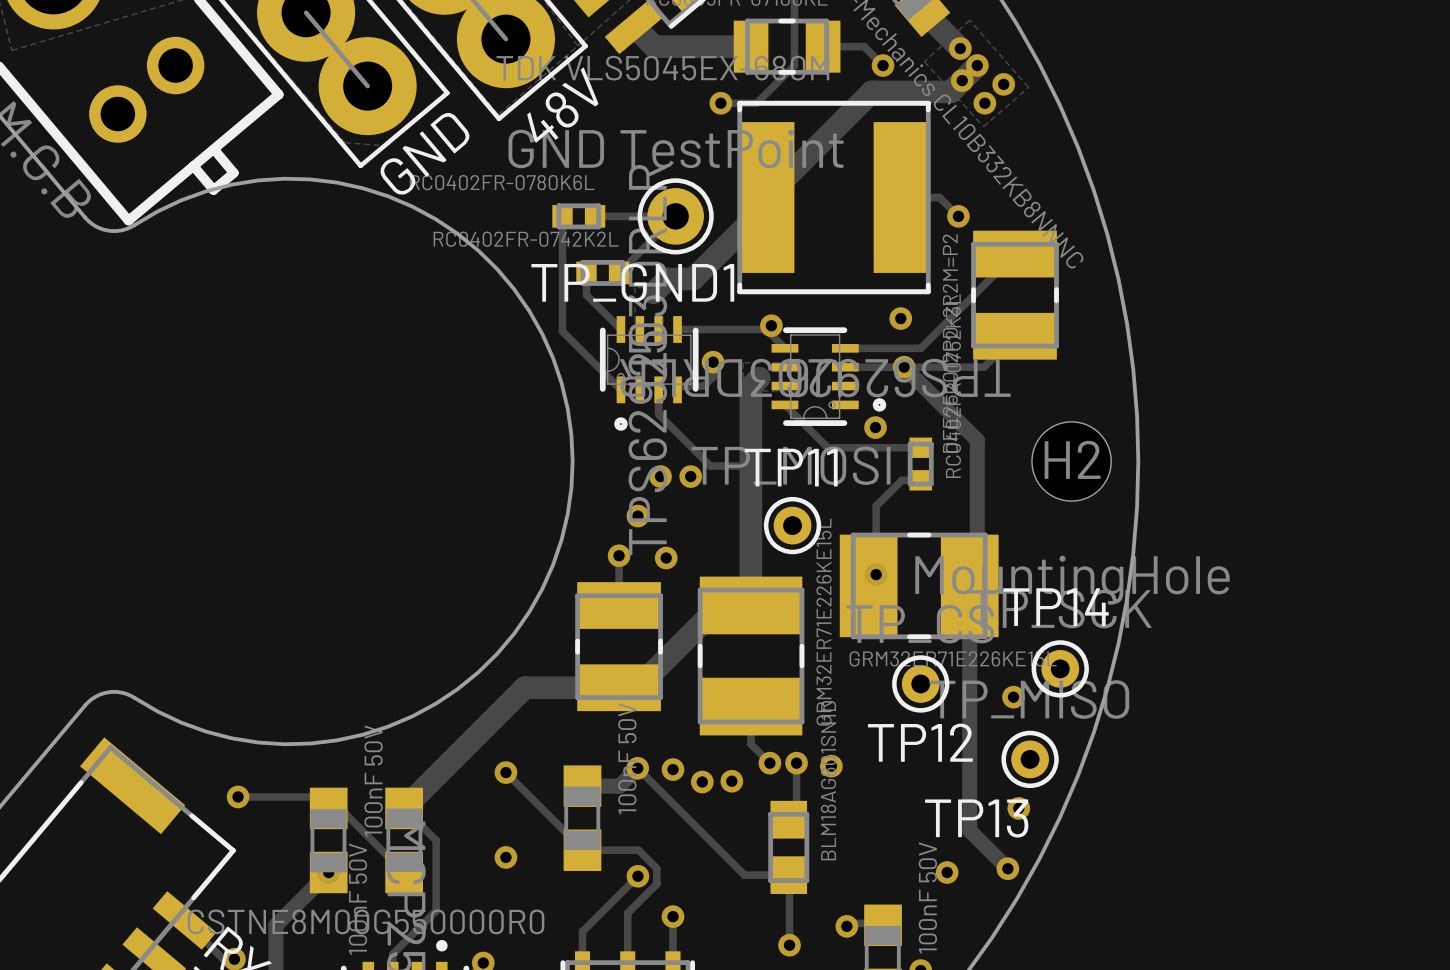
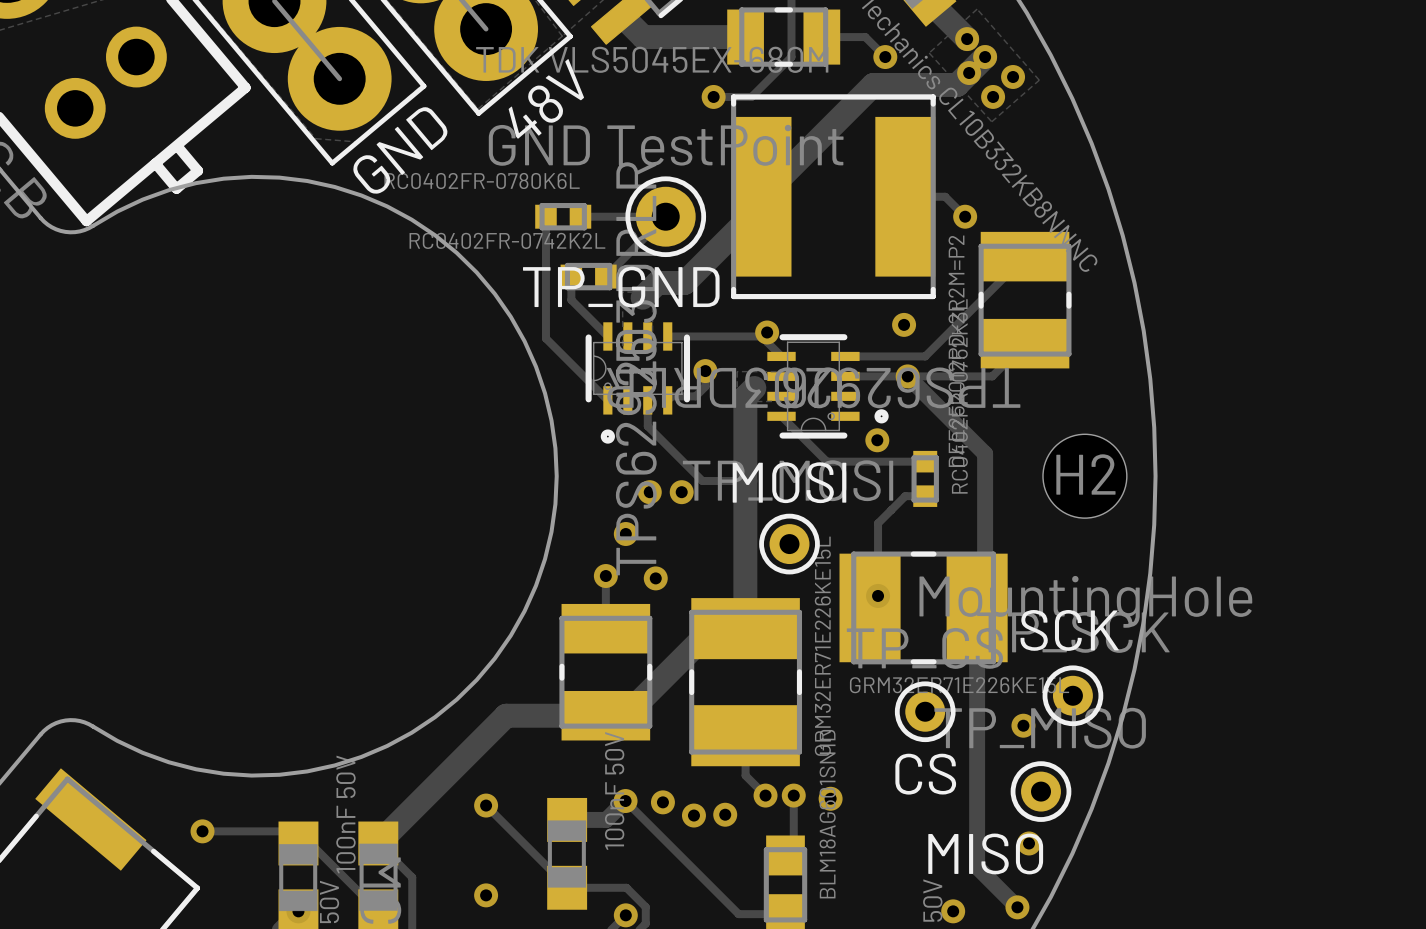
TP_GND1 name: TP_GND1 (632, 282) -> TP_GND (621, 287)
TP11 name: TP11 (791, 467) -> MOSI (789, 482)
TP14 name: TP14 (1056, 607) -> SCK (1069, 630)
TP12 name: TP12 (920, 742) -> CS (925, 774)
TP13 name: TP13 (976, 818) -> MISO (985, 853)

